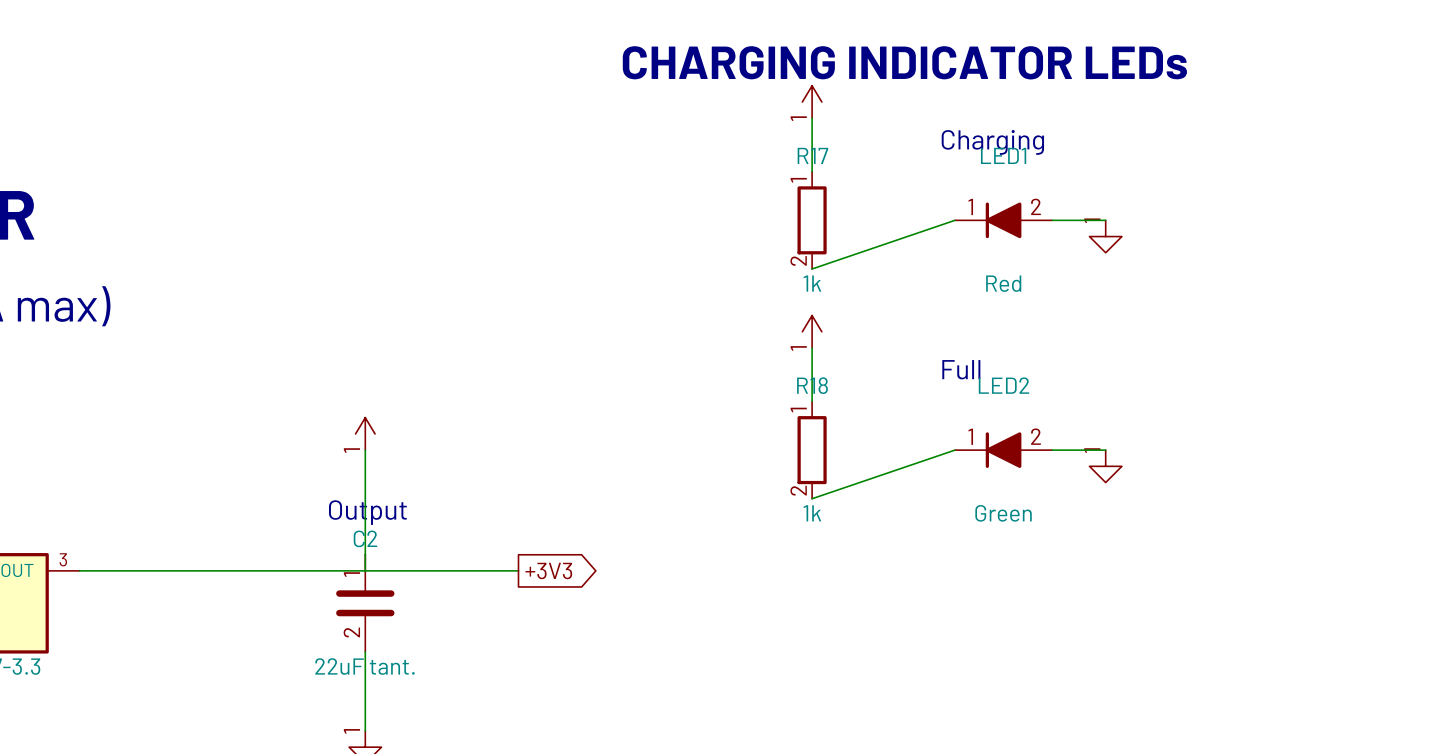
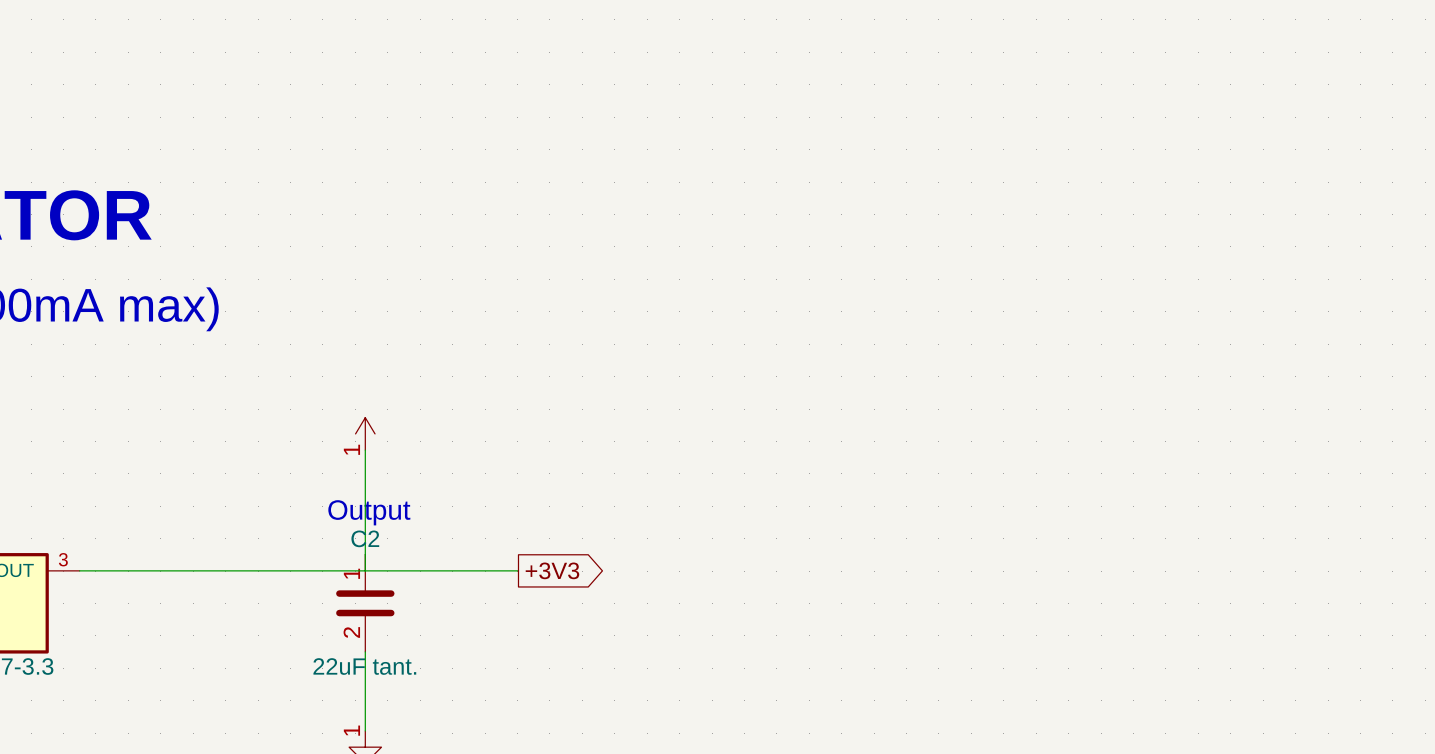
text: CHARGING INDICATOR LEDs (904, 62) -> none
power symbol: (812, 102) -> none
wire: (812, 118) (812, 171) -> none
text: Charging (992, 142) -> none
R17: 1k (812, 220) -> none
wire: (954, 220) (812, 268) -> none
LED1: Red (1003, 220) -> none
wire: (1052, 220) (1105, 220) -> none
power symbol: (1105, 236) -> none
power symbol: (812, 331) -> none
wire: (812, 348) (812, 401) -> none
text: Full (961, 369) -> none
R18: 1k (812, 450) -> none
wire: (954, 450) (812, 498) -> none
LED2: Green (1003, 450) -> none
wire: (1052, 450) (1105, 450) -> none
power symbol: (1105, 466) -> none

